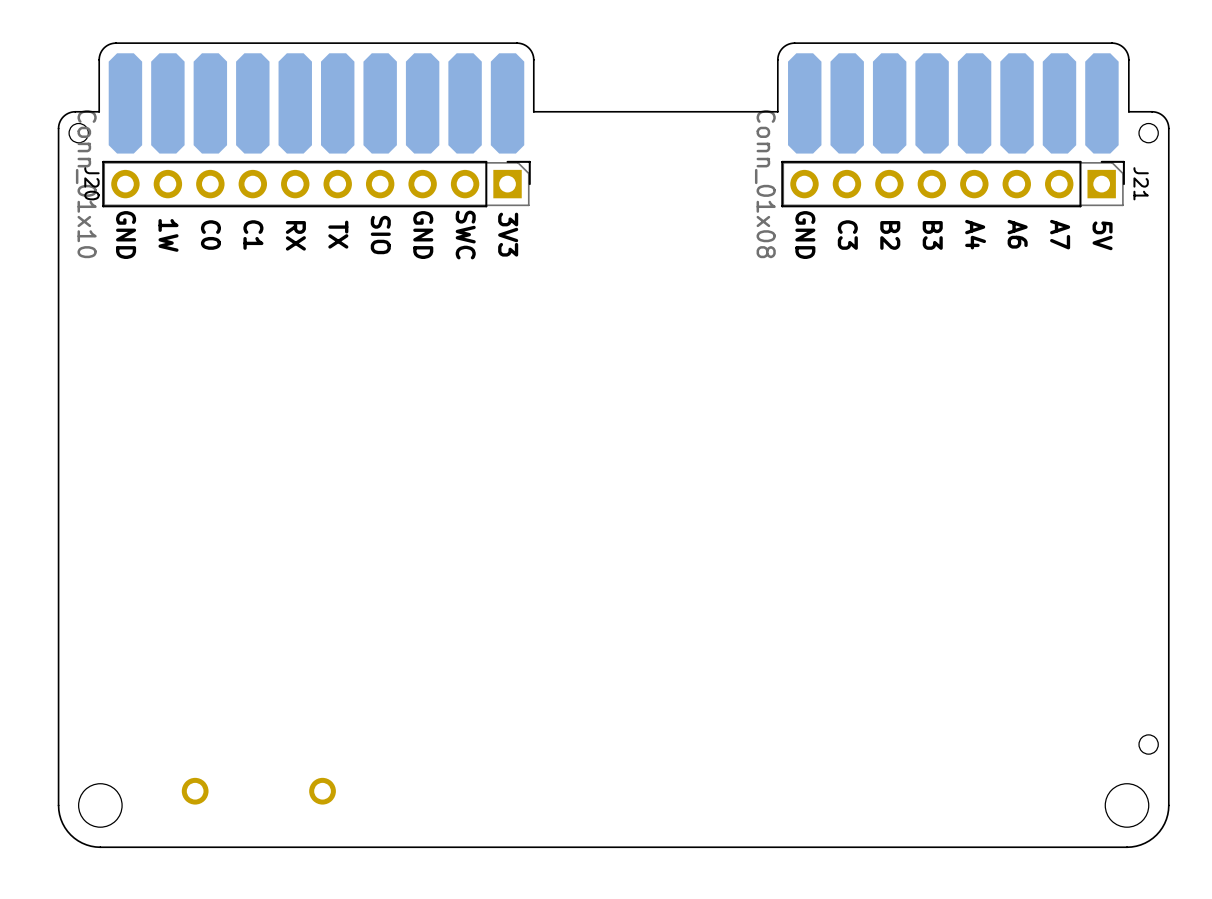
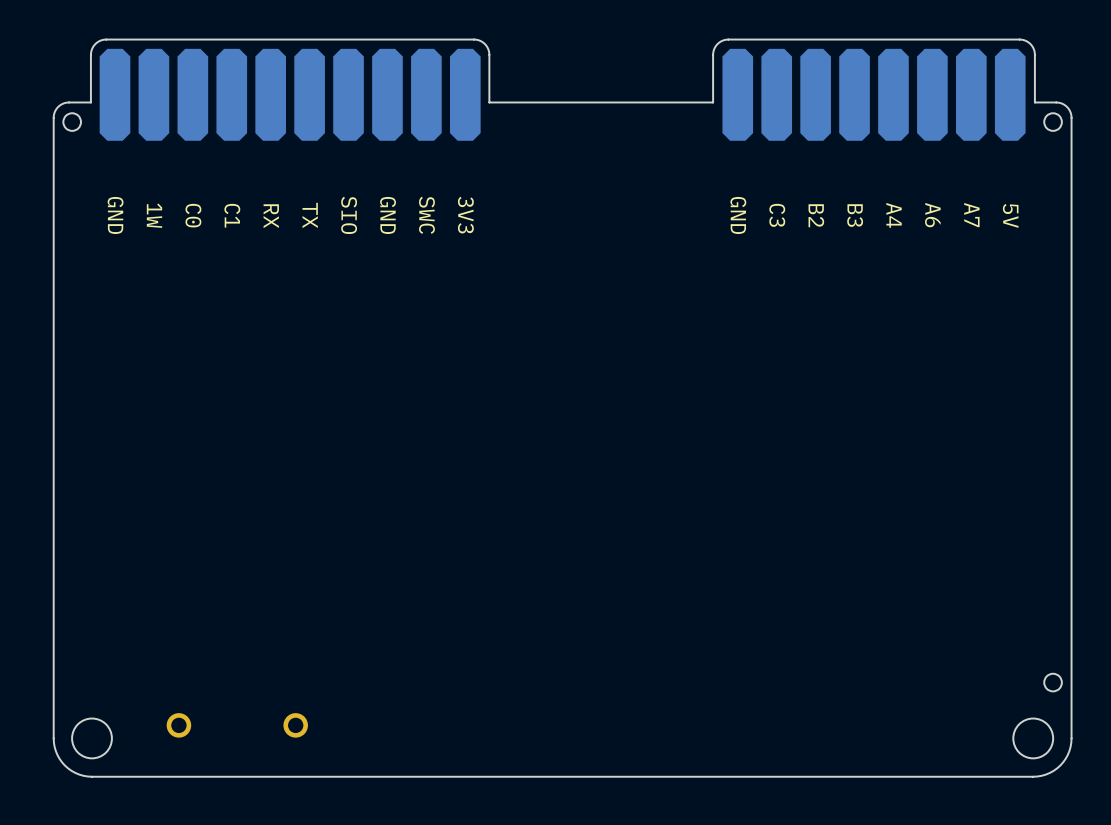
J20: Conn_01x10 (316, 184) -> none
J21: Conn_01x08 (953, 184) -> none

